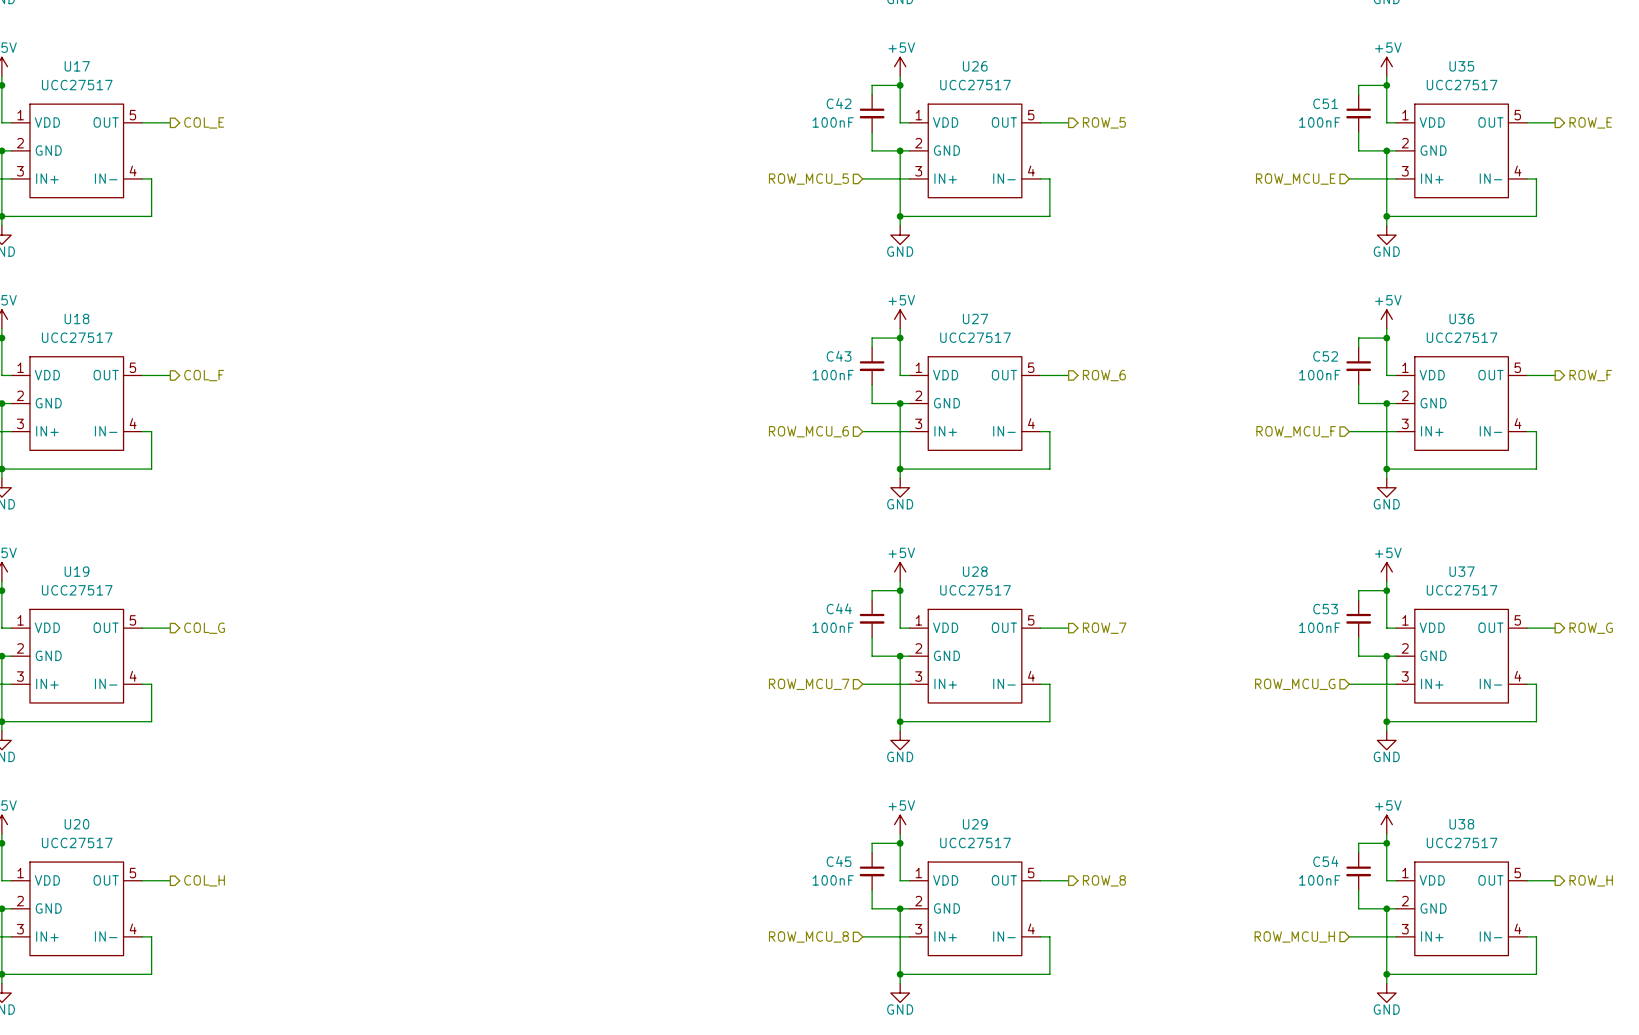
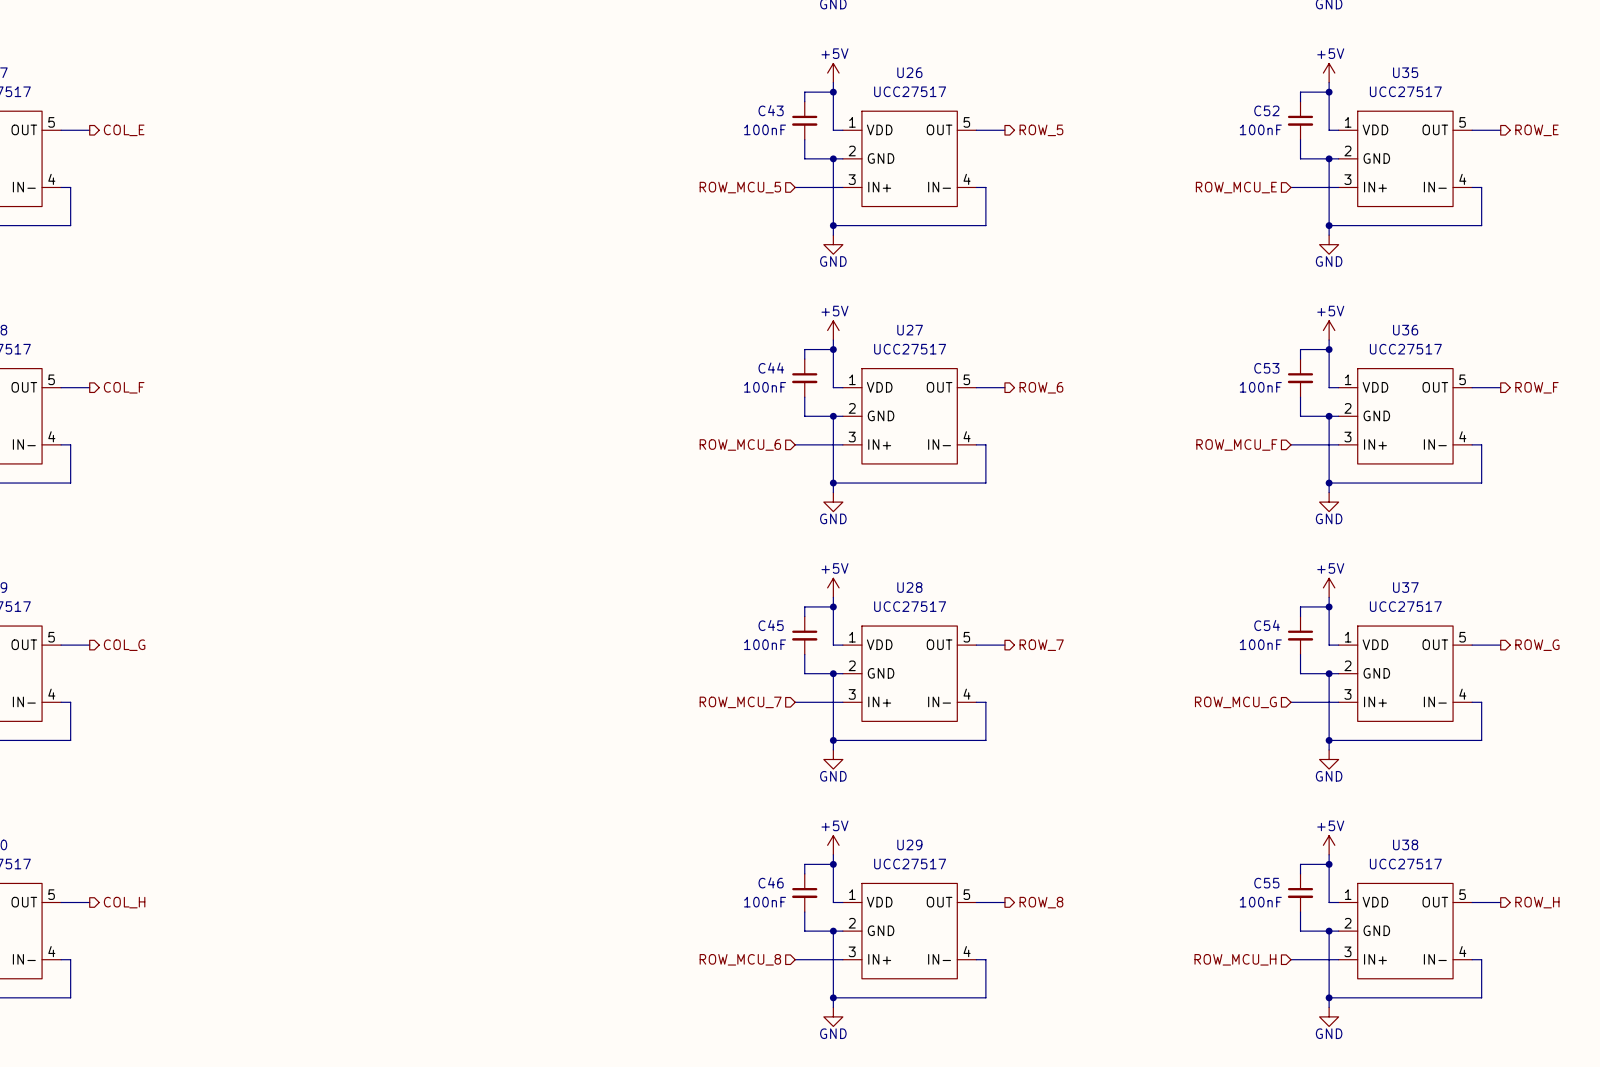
C42 name: C42 (839, 103) -> C43 (771, 110)
C51 name: C51 (1325, 103) -> C52 (1266, 110)
C43 name: C43 (839, 356) -> C44 (771, 368)
C52 name: C52 (1325, 356) -> C53 (1266, 368)
C44 name: C44 (839, 608) -> C45 (771, 625)
C53 name: C53 (1325, 609) -> C54 (1267, 625)
C45 name: C45 (839, 861) -> C46 (771, 882)
C54 name: C54 (1325, 861) -> C55 (1266, 883)

